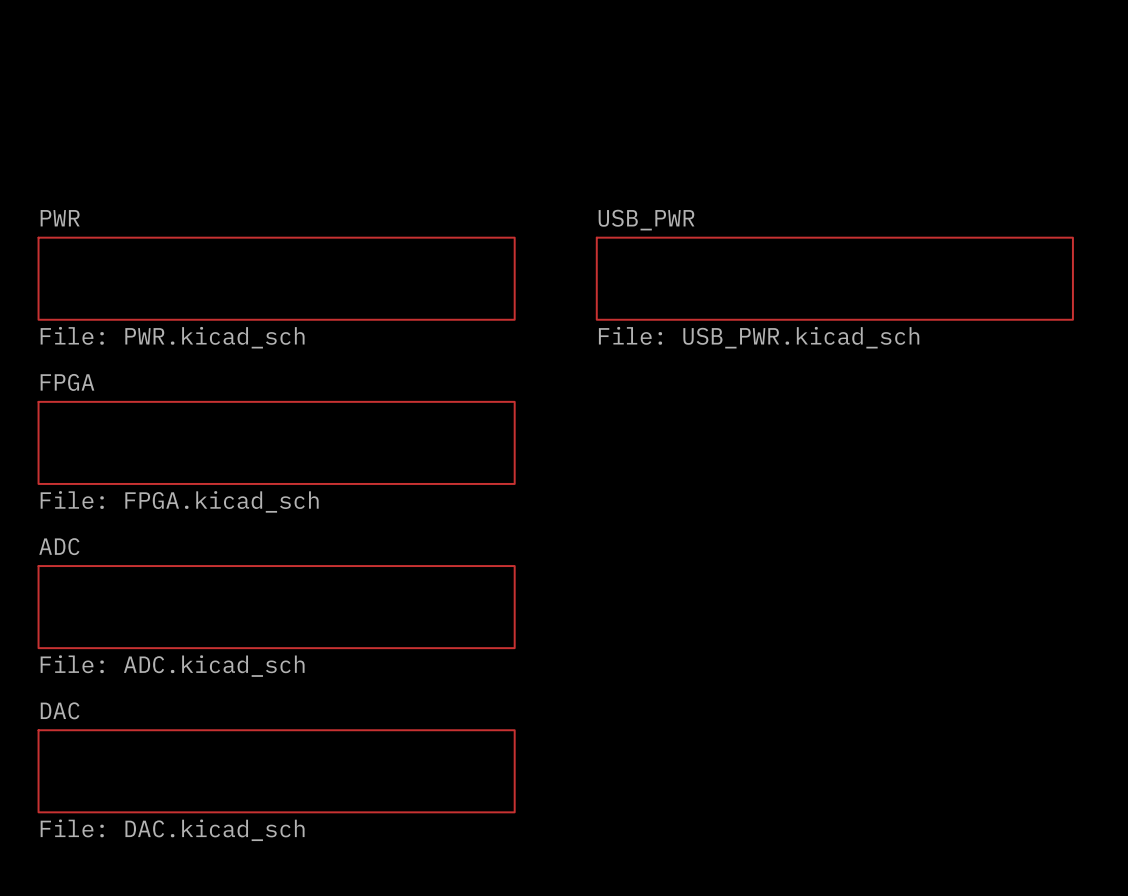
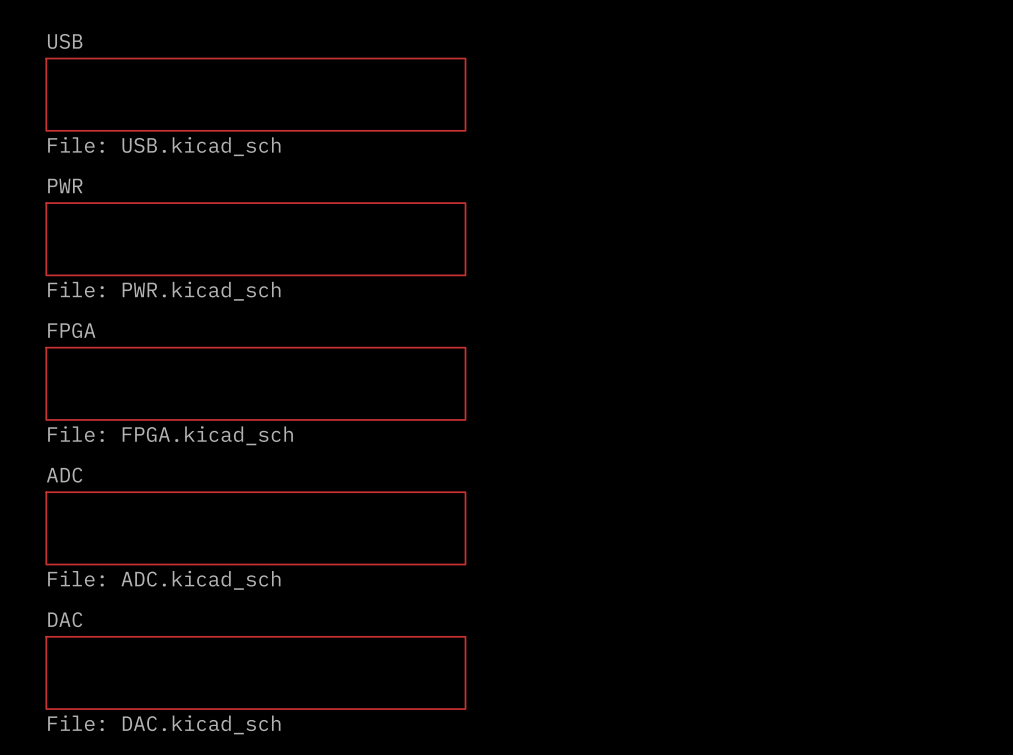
sheet USB: none -> File: USB.kicad_sch (255, 94)
sheet USB_PWR: File: USB_PWR.kicad_sch (834, 278) -> none

